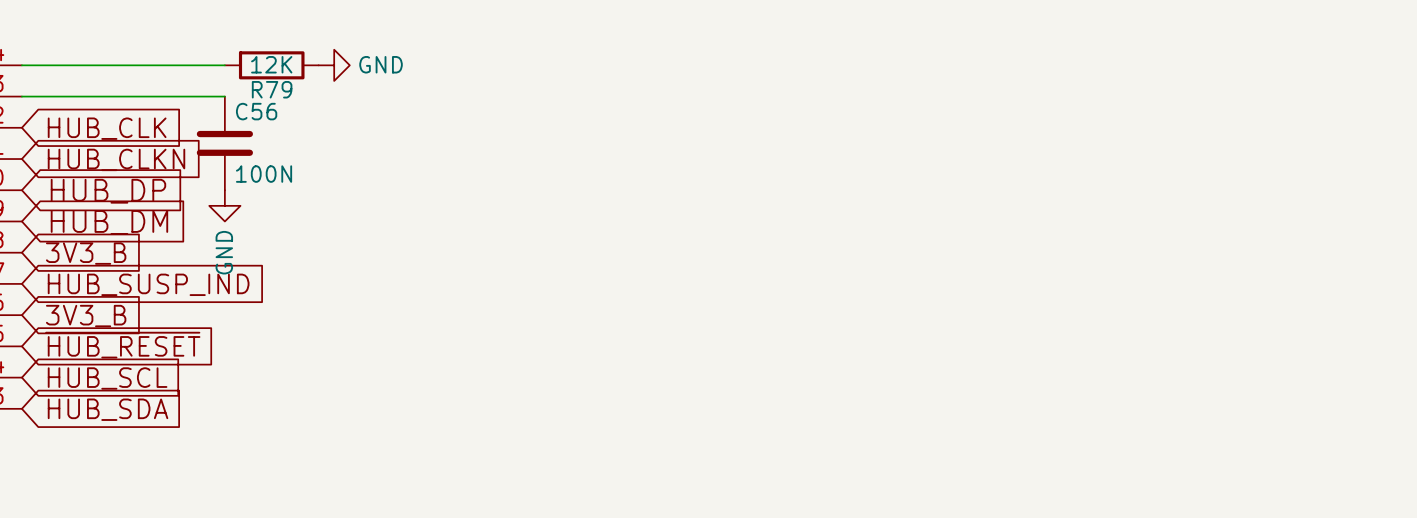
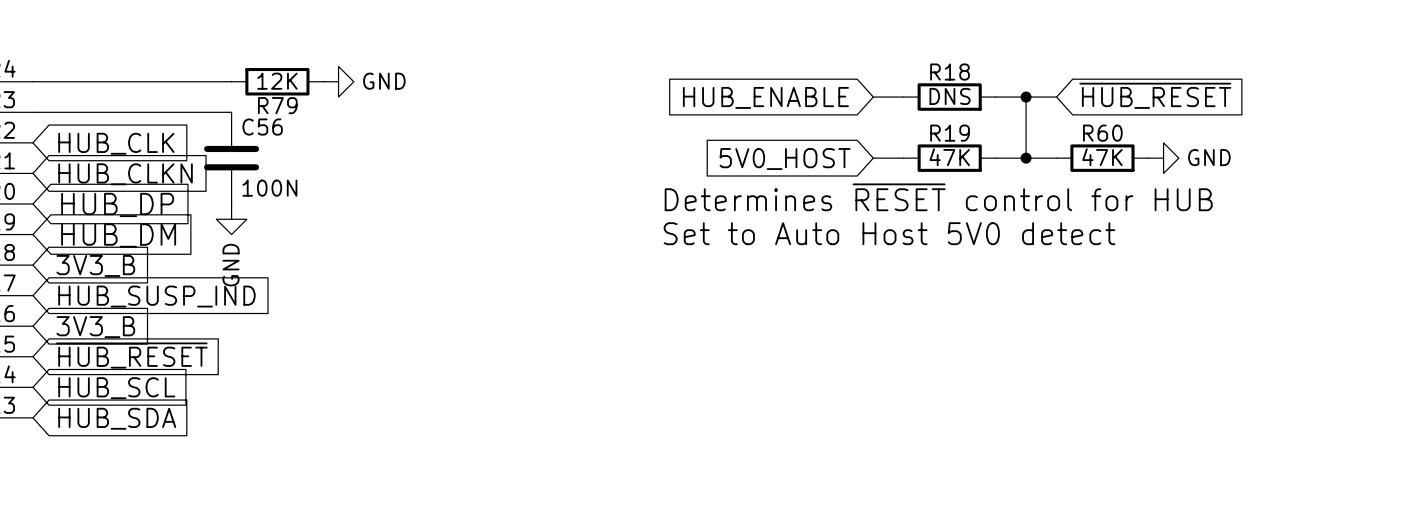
global label: none -> ~{HUB_RESET} (1155, 95)
wire: none -> (873, 97) (903, 97)
R18: none -> DNS (949, 97)
wire: none -> (995, 97) (1056, 97)
wire: none -> (1026, 97) (1026, 158)
junction: none -> (1026, 97)
global label: none -> HUB_ENABLE (765, 97)
wire: none -> (873, 158) (903, 158)
R19: none -> 47K (949, 158)
wire: none -> (995, 158) (1056, 158)
junction: none -> (1026, 158)
R60: none -> 47K (1102, 158)
power symbol: none -> GND (1163, 158)
global label: none -> 5V0_HOST (785, 159)
text: none -> Determines ~{RESET} control for HUB (938, 197)
text: none -> Set to Auto Host 5V0 detect (889, 233)

